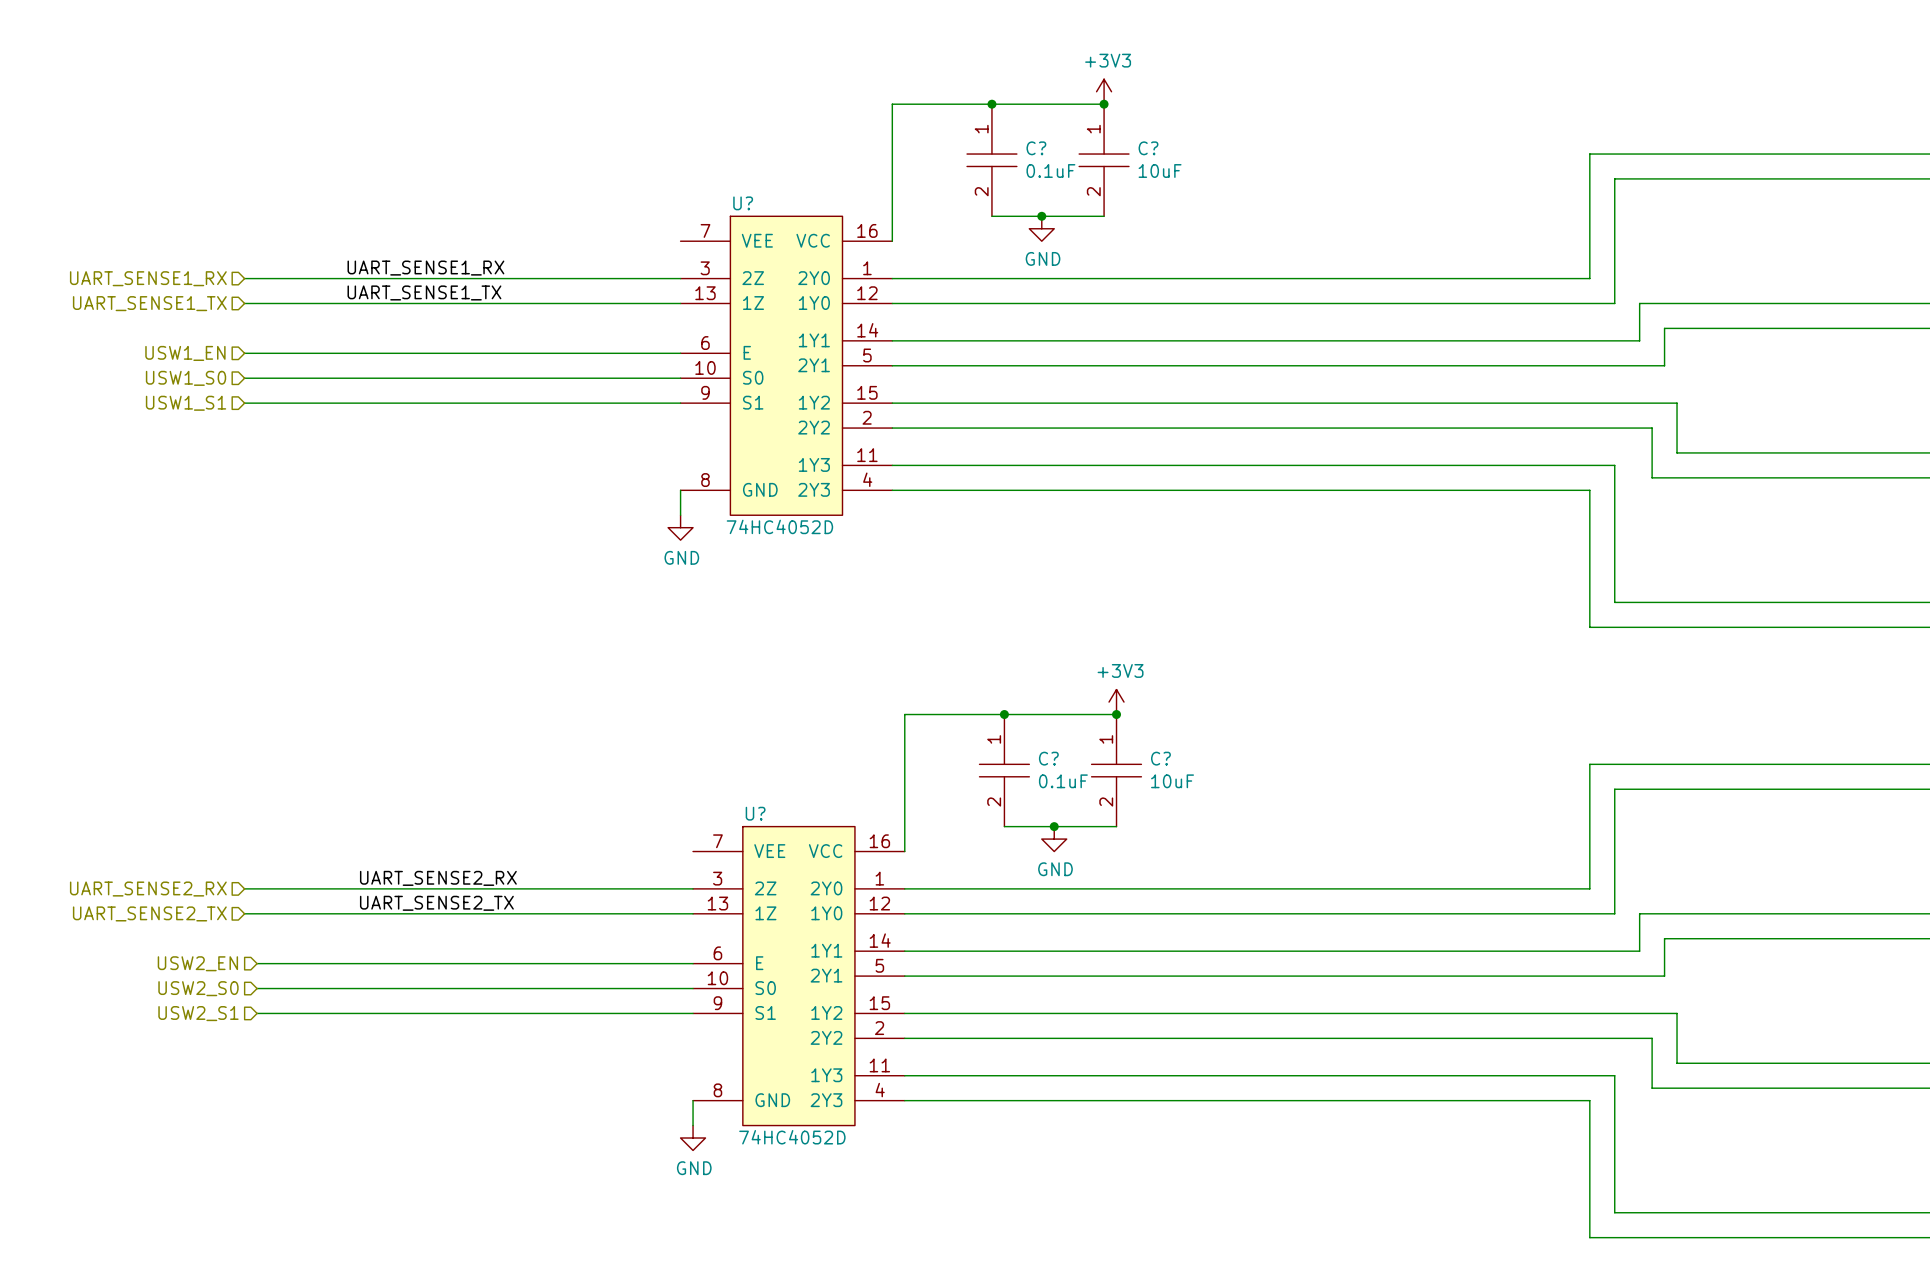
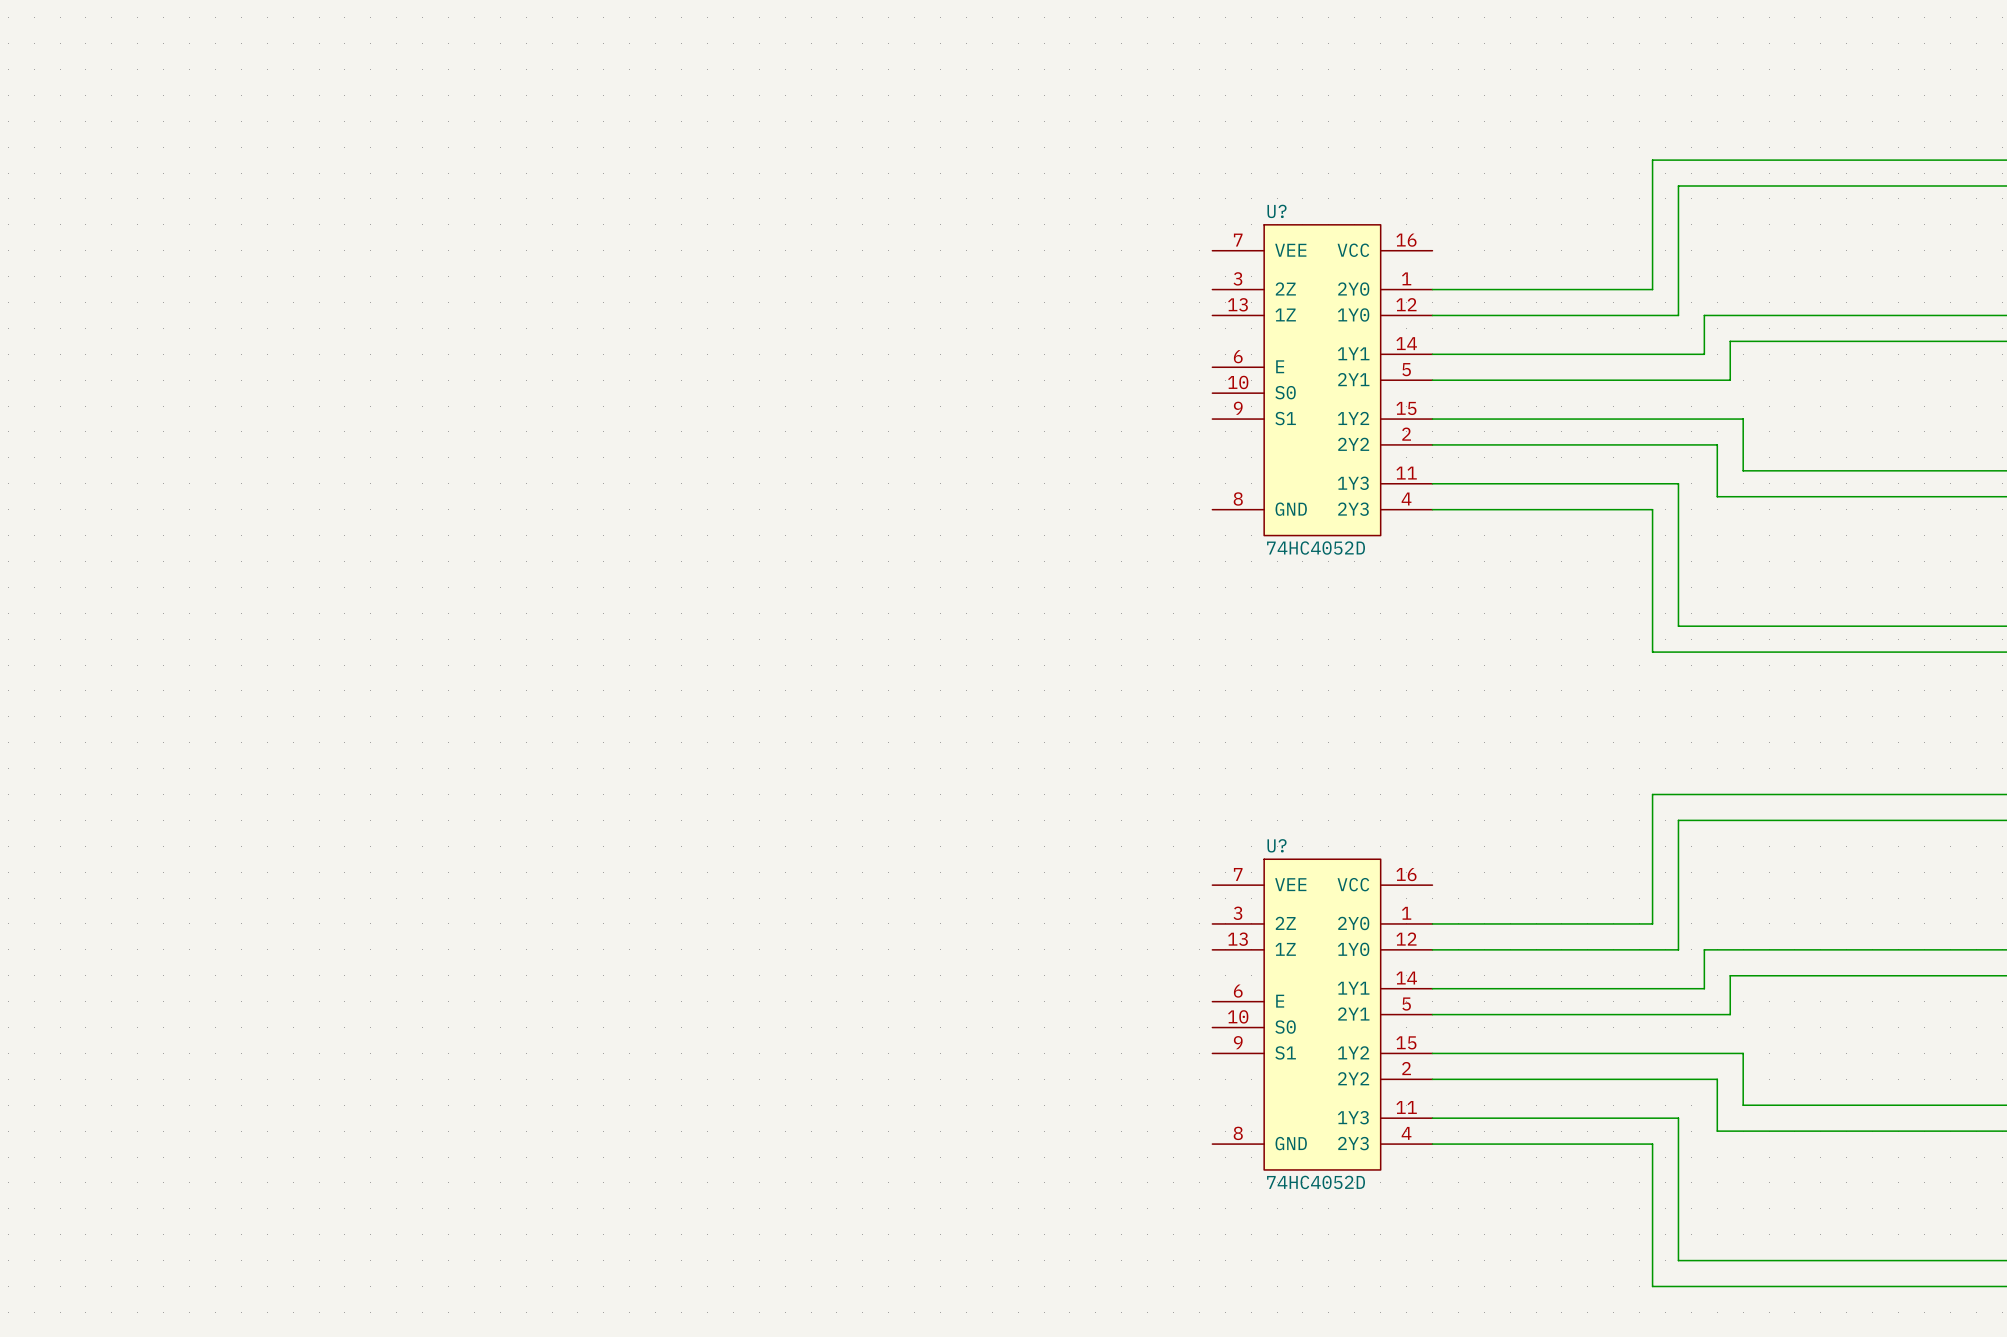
power symbol: +3V3 (1104, 91) -> none
junction: (991, 104) -> none
wire: (1104, 104) (892, 104) (892, 241) -> none
junction: (1104, 104) -> none
C?: (991, 160) -> none
C?: (1104, 160) -> none
wire: (991, 216) (1104, 216) -> none
junction: (1041, 216) -> none
power symbol: GND (1041, 228) -> none
label: UART_SENSE1_RX (425, 268) -> none
hierarchical label: UART_SENSE1_RX (148, 278) -> none
wire: (244, 278) (680, 278) -> none
wire: (892, 278) (1378, 278) -> none
label: UART_SENSE1_TX (424, 292) -> none
hierarchical label: UART_SENSE1_TX (149, 303) -> none
wire: (244, 303) (680, 303) -> none
wire: (892, 303) (1378, 303) -> none
wire: (892, 340) (1378, 340) -> none
hierarchical label: USW1_EN (185, 353) -> none
wire: (244, 353) (680, 353) -> none
U?: (786, 365) -> none
wire: (892, 365) (1378, 365) -> none
U?: none -> (1322, 380)
hierarchical label: USW1_S0 (186, 378) -> none
wire: (244, 378) (680, 378) -> none
hierarchical label: USW1_S1 (186, 403) -> none
wire: (244, 403) (680, 403) -> none
wire: (892, 403) (1378, 403) -> none
wire: (892, 428) (1378, 428) -> none
wire: (892, 465) (1378, 465) -> none
wire: (680, 490) (680, 515) -> none
wire: (892, 490) (1378, 490) -> none
power symbol: GND (680, 527) -> none
power symbol: +3V3 (1116, 702) -> none
junction: (1004, 714) -> none
wire: (1116, 714) (904, 714) (904, 851) -> none
junction: (1116, 714) -> none
C?: (1004, 770) -> none
C?: (1116, 770) -> none
wire: (1004, 826) (1116, 826) -> none
junction: (1054, 826) -> none
power symbol: GND (1054, 839) -> none
label: UART_SENSE2_RX (438, 878) -> none
wire: (244, 888) (693, 888) -> none
wire: (904, 888) (1378, 888) -> none
hierarchical label: UART_SENSE2_RX (148, 889) -> none
label: UART_SENSE2_TX (436, 903) -> none
hierarchical label: UART_SENSE2_TX (149, 913) -> none
wire: (244, 913) (693, 913) -> none
wire: (904, 913) (1378, 913) -> none
wire: (904, 951) (1378, 951) -> none
hierarchical label: USW2_EN (197, 963) -> none
wire: (257, 963) (693, 963) -> none
U?: (798, 976) -> none
wire: (904, 976) (1378, 976) -> none
U?: none -> (1322, 1014)
hierarchical label: USW2_S0 (198, 988) -> none
wire: (257, 988) (693, 988) -> none
hierarchical label: USW2_S1 (198, 1013) -> none
wire: (257, 1013) (693, 1013) -> none
wire: (904, 1013) (1378, 1013) -> none
wire: (904, 1038) (1378, 1038) -> none
wire: (904, 1075) (1378, 1075) -> none
wire: (693, 1100) (693, 1125) -> none
wire: (904, 1100) (1378, 1100) -> none
power symbol: GND (693, 1138) -> none

